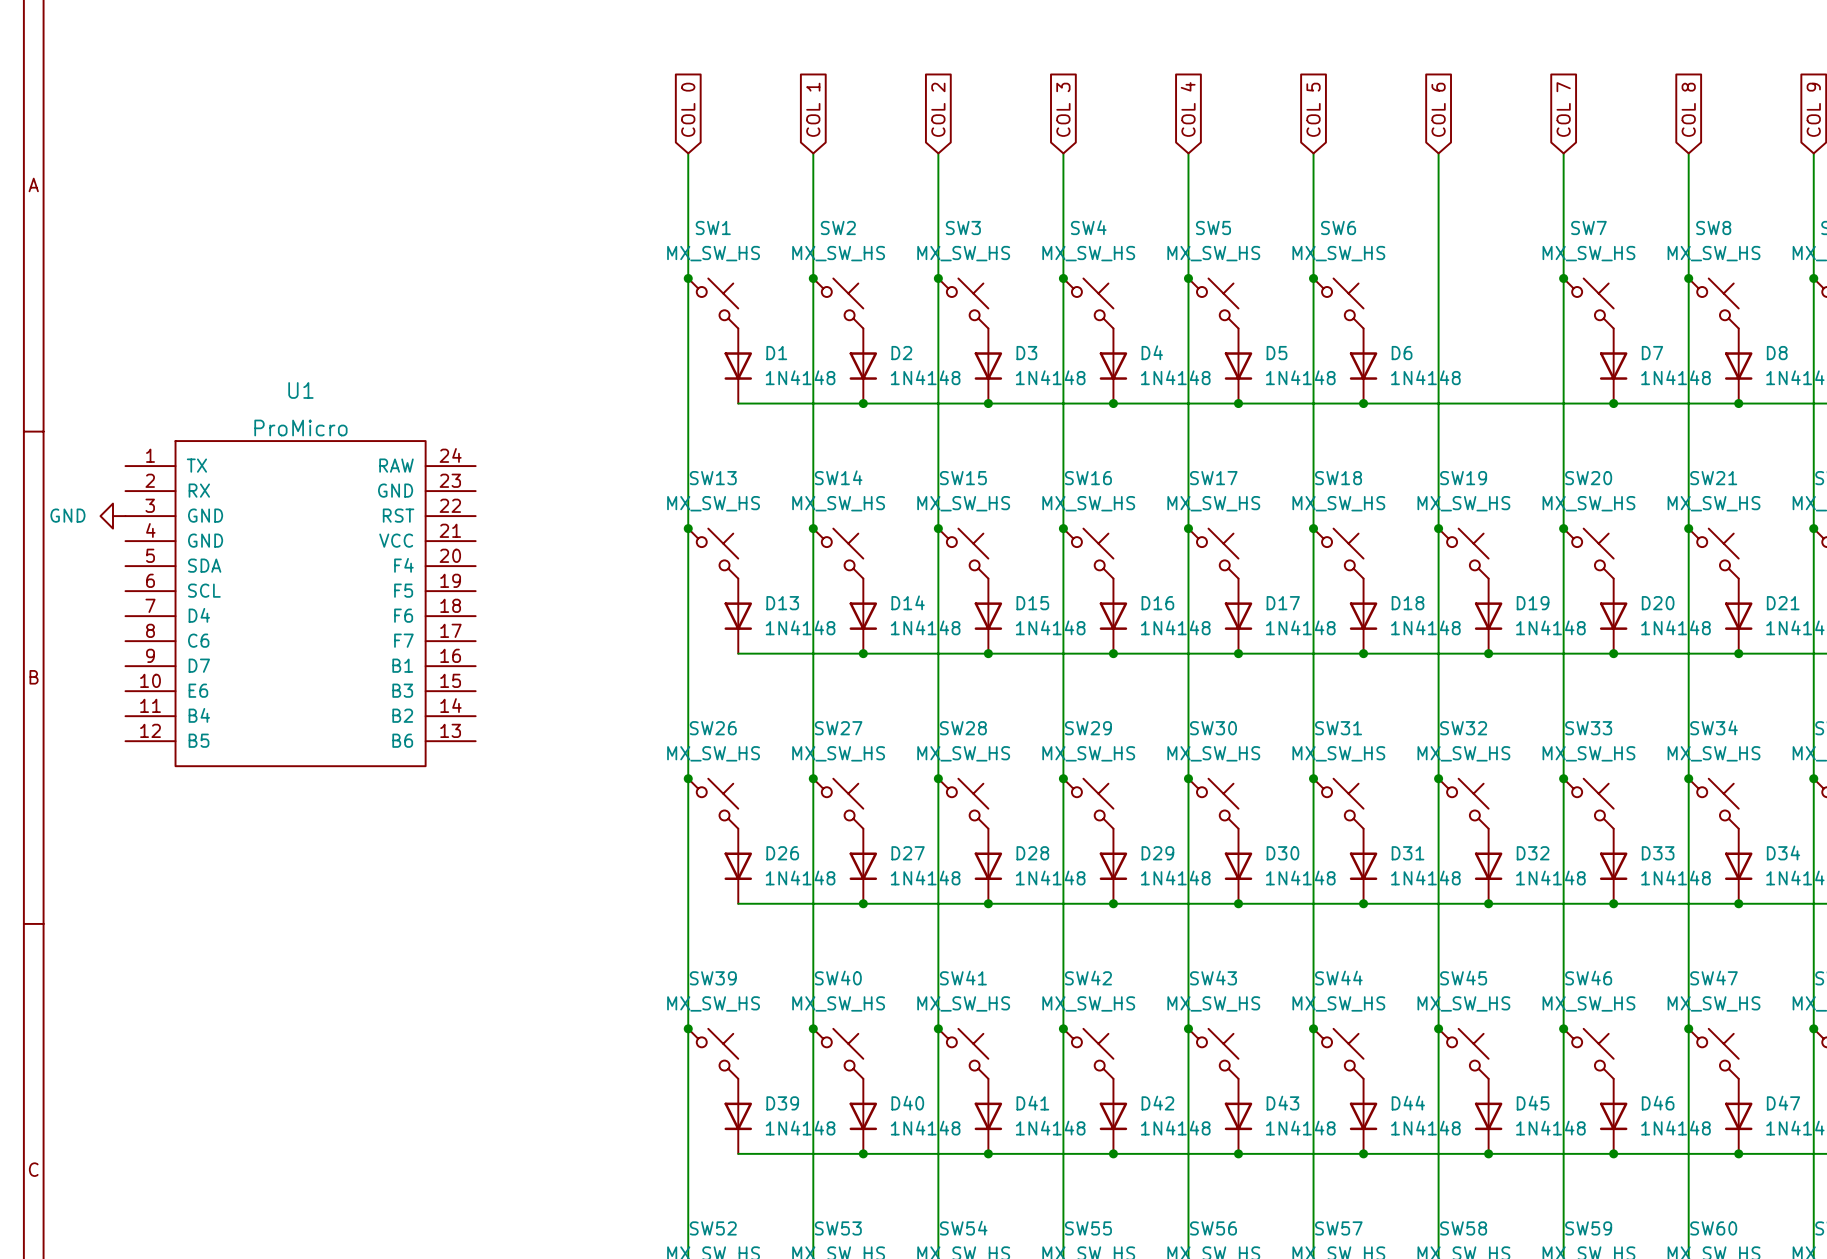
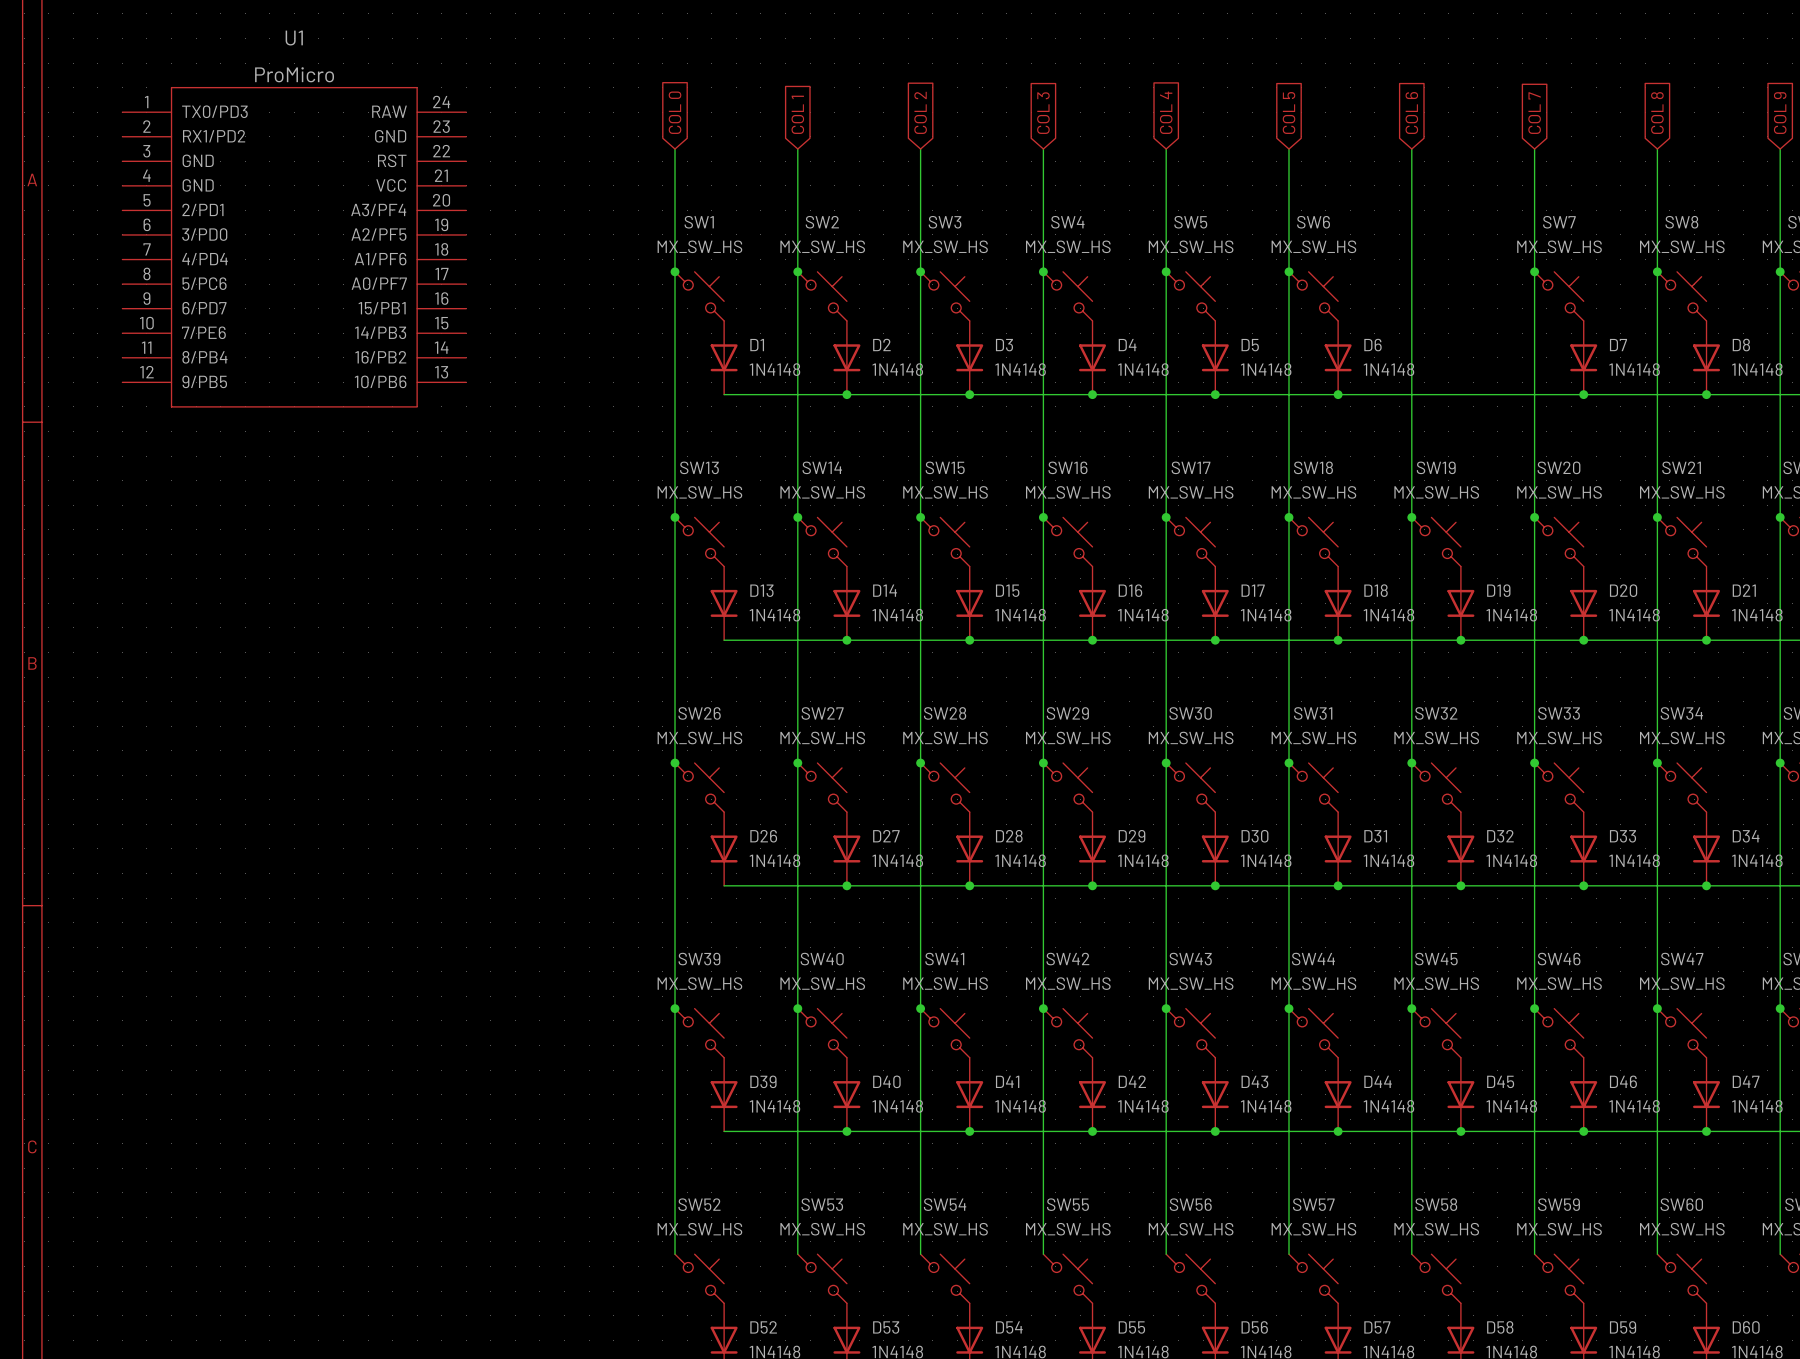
U1 symbol: [125, 441, 476, 767] -> [122, 87, 467, 407]
power symbol: GND (112, 516) -> none

